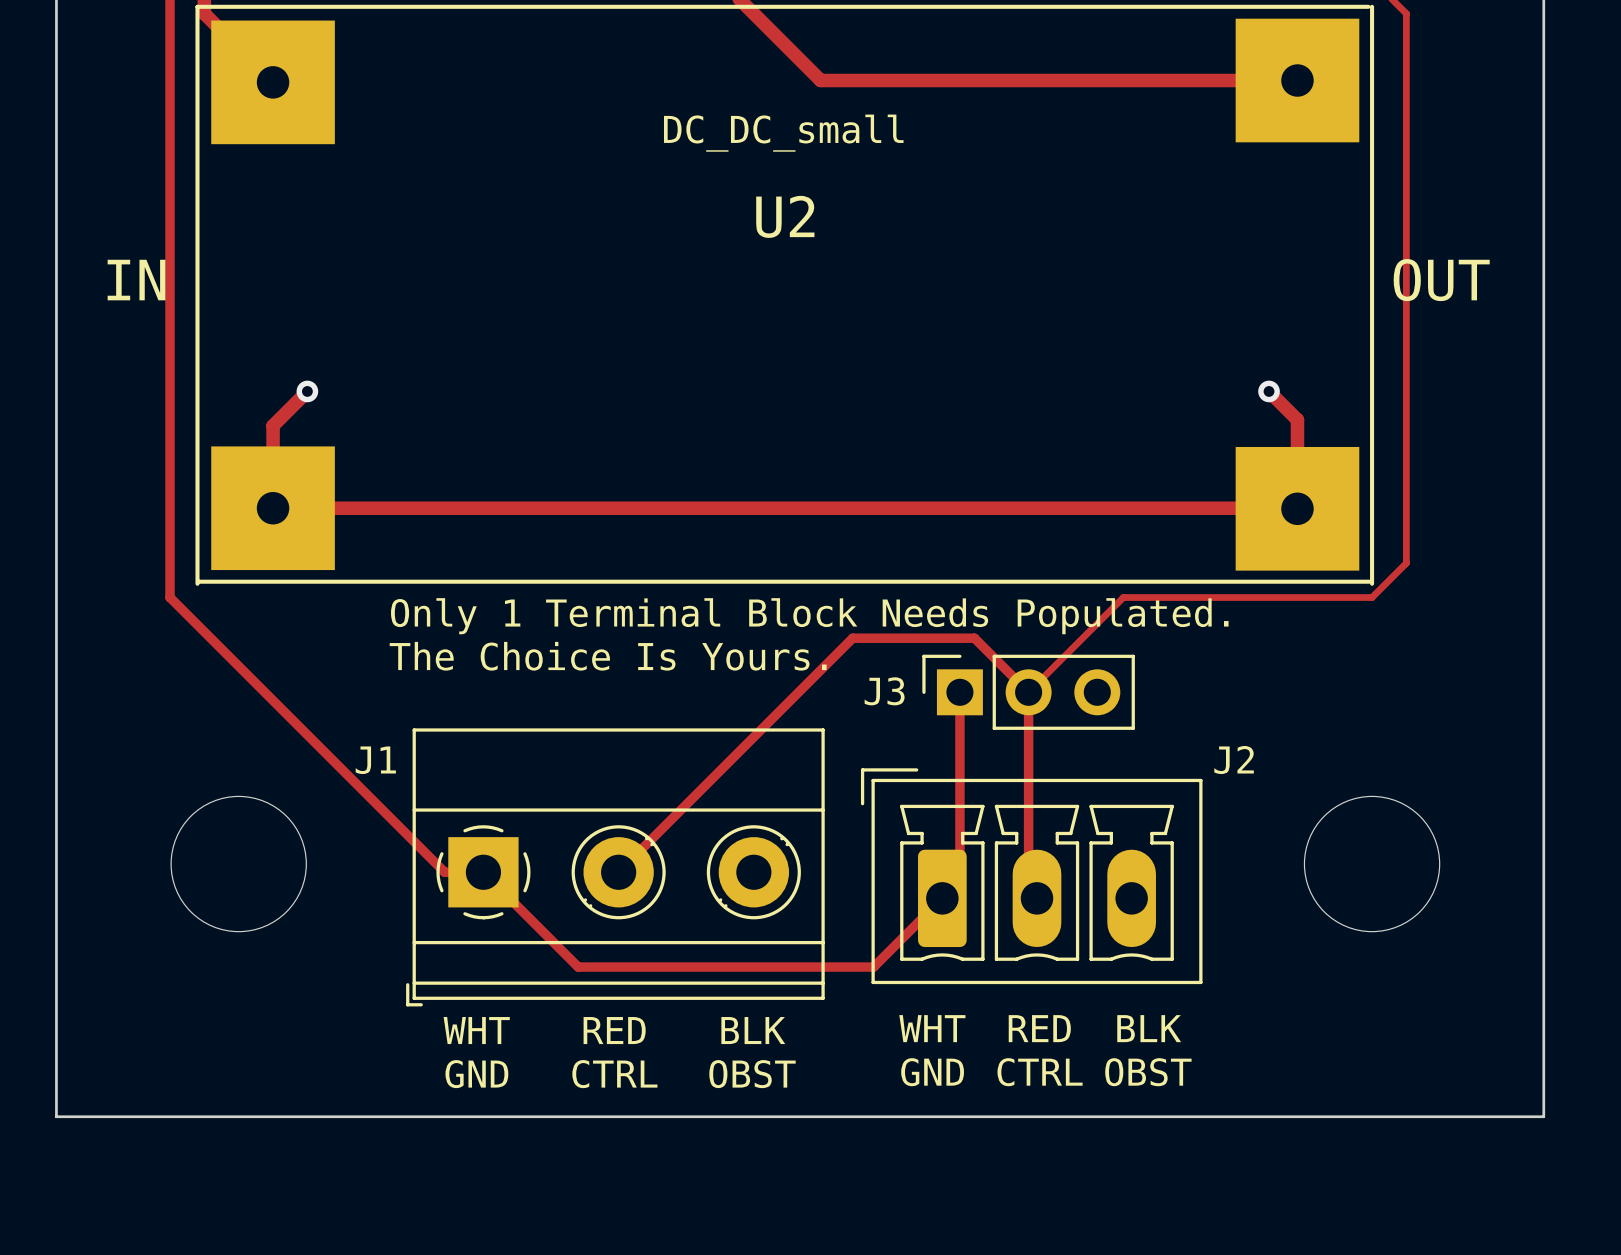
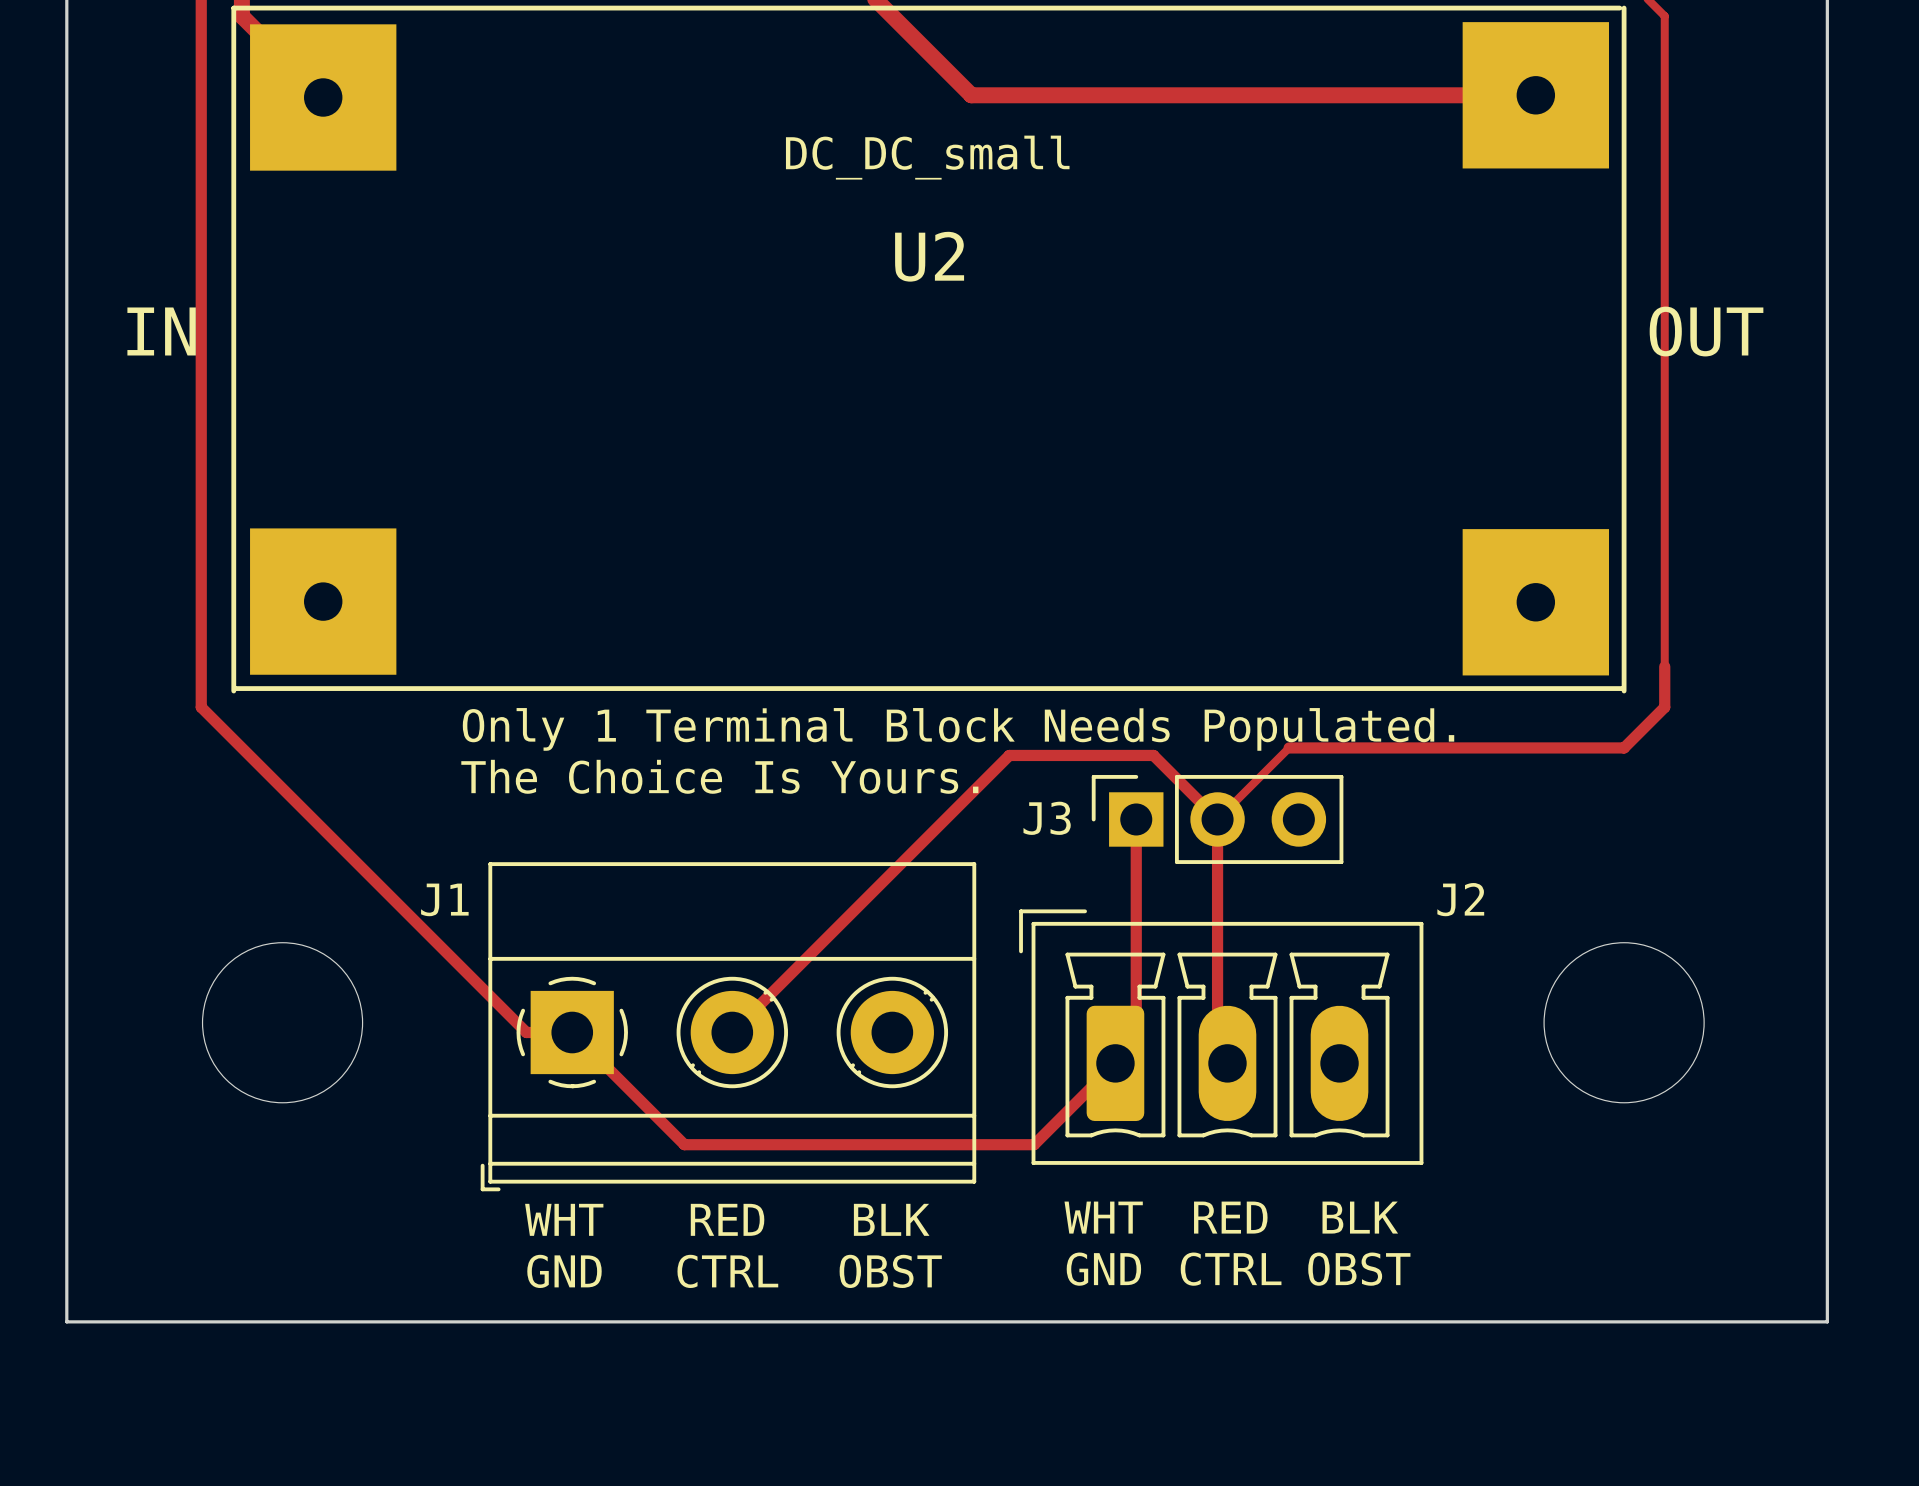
top track: (307, 391) (273, 425) (273, 508) (1296, 508) -> none
via: (307, 391) -> none
top track: (1269, 391) (1297, 419) (1297, 508) -> none
via: (1269, 391) -> none
top track: (1406, 563) (1372, 597) (1123, 597) (1089, 631) -> (1664, 666) (1664, 707) (1624, 747) (1289, 747)

